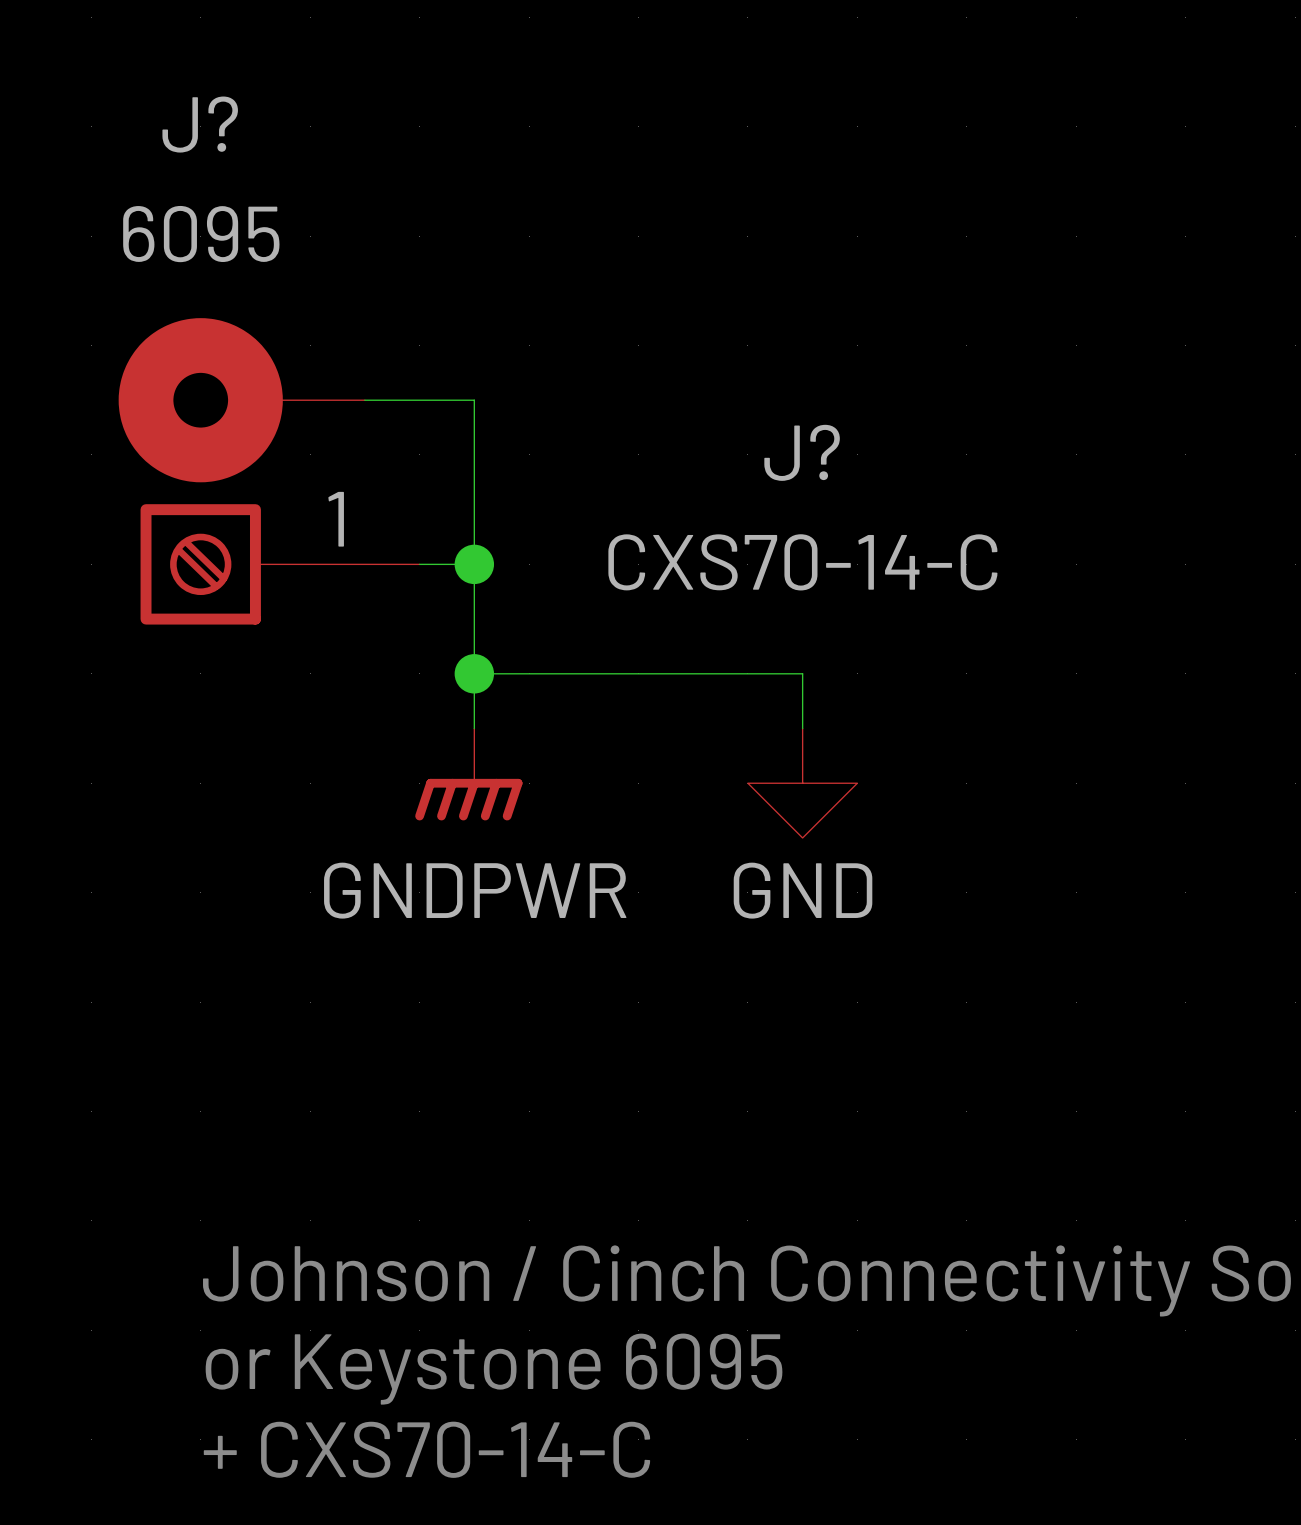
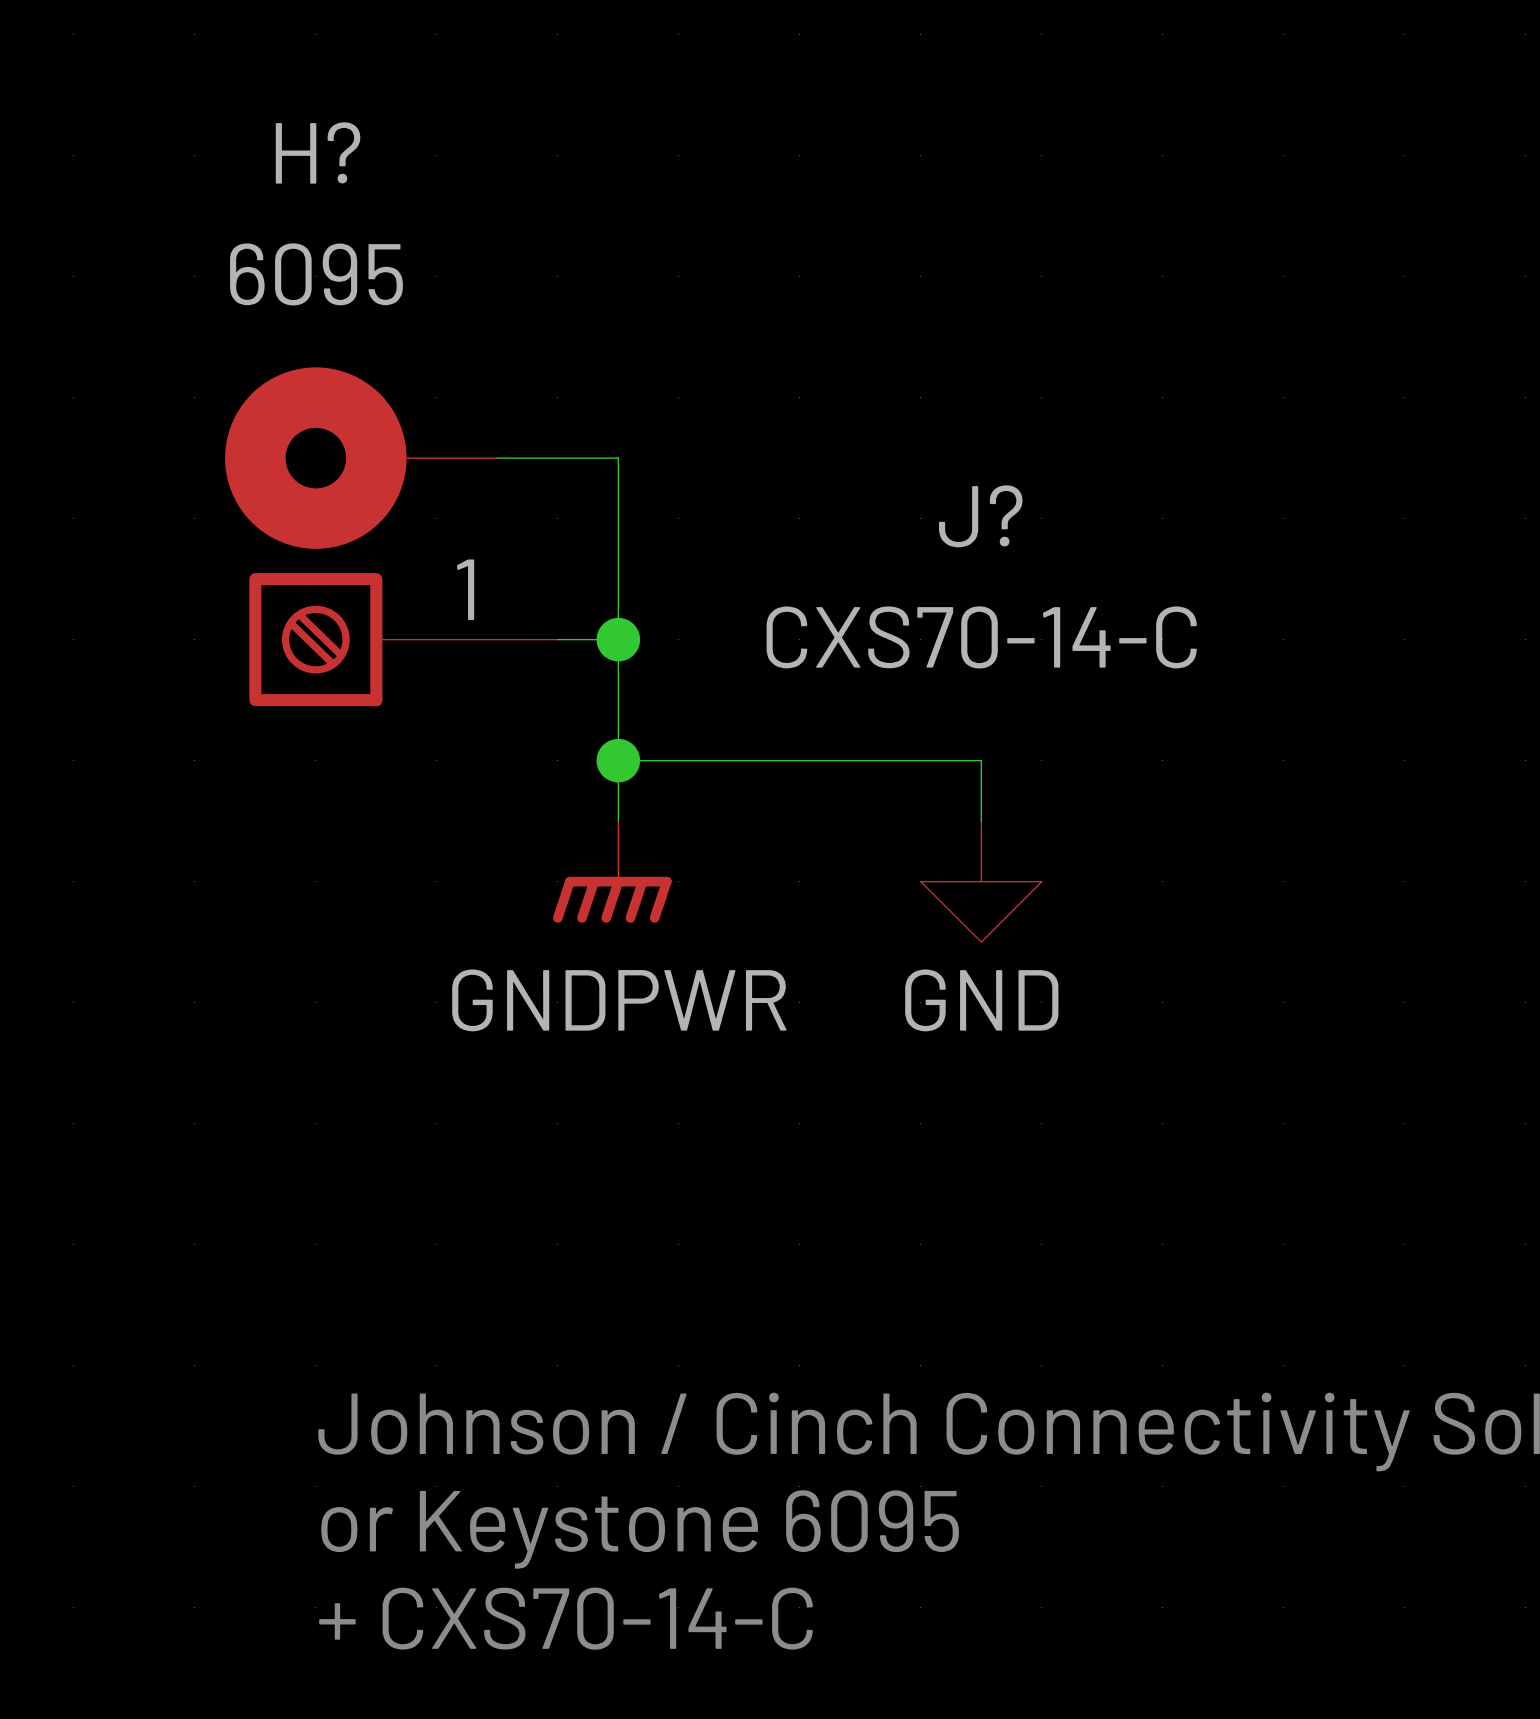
J? name: J? (200, 124) -> H? (318, 152)

